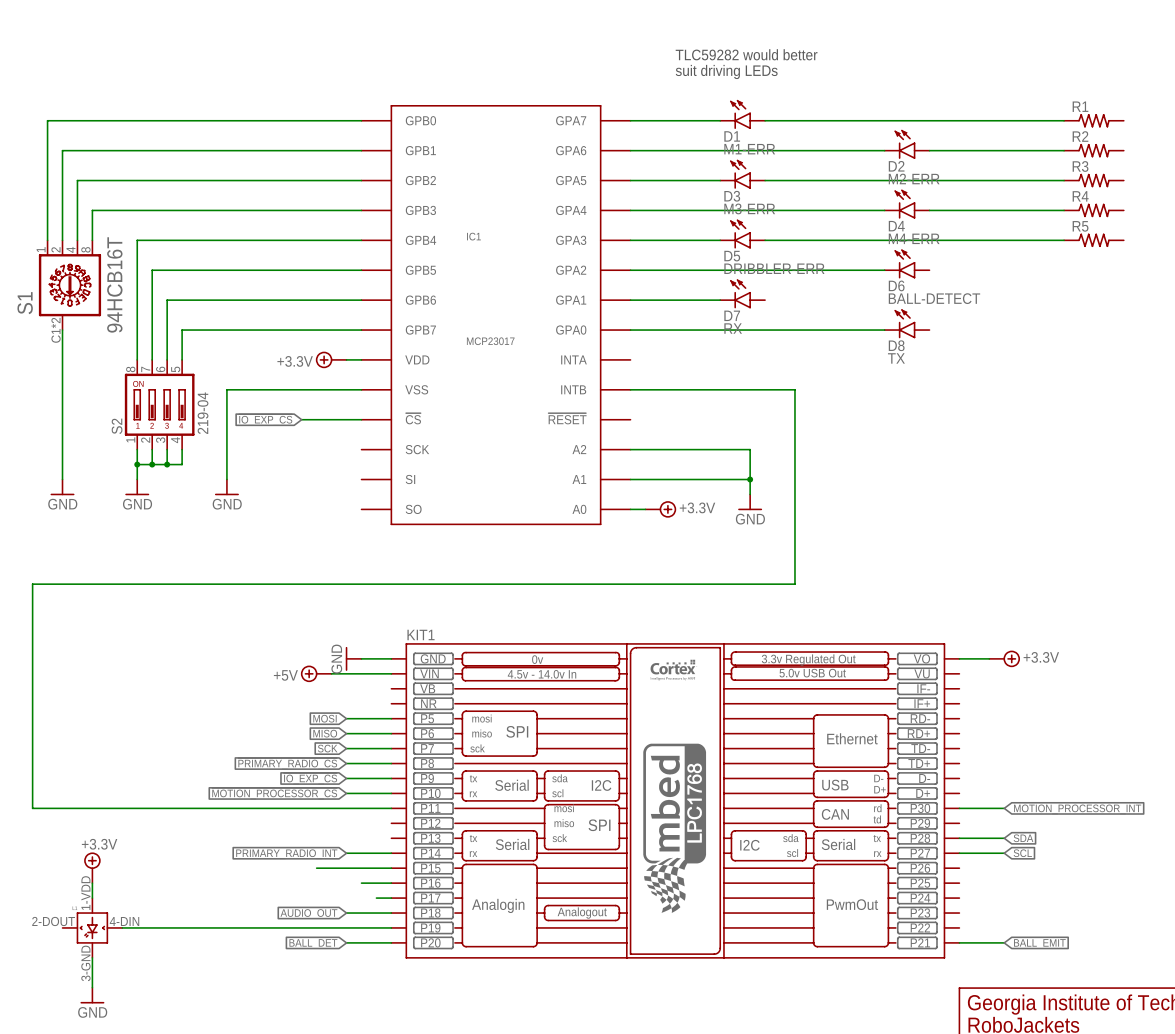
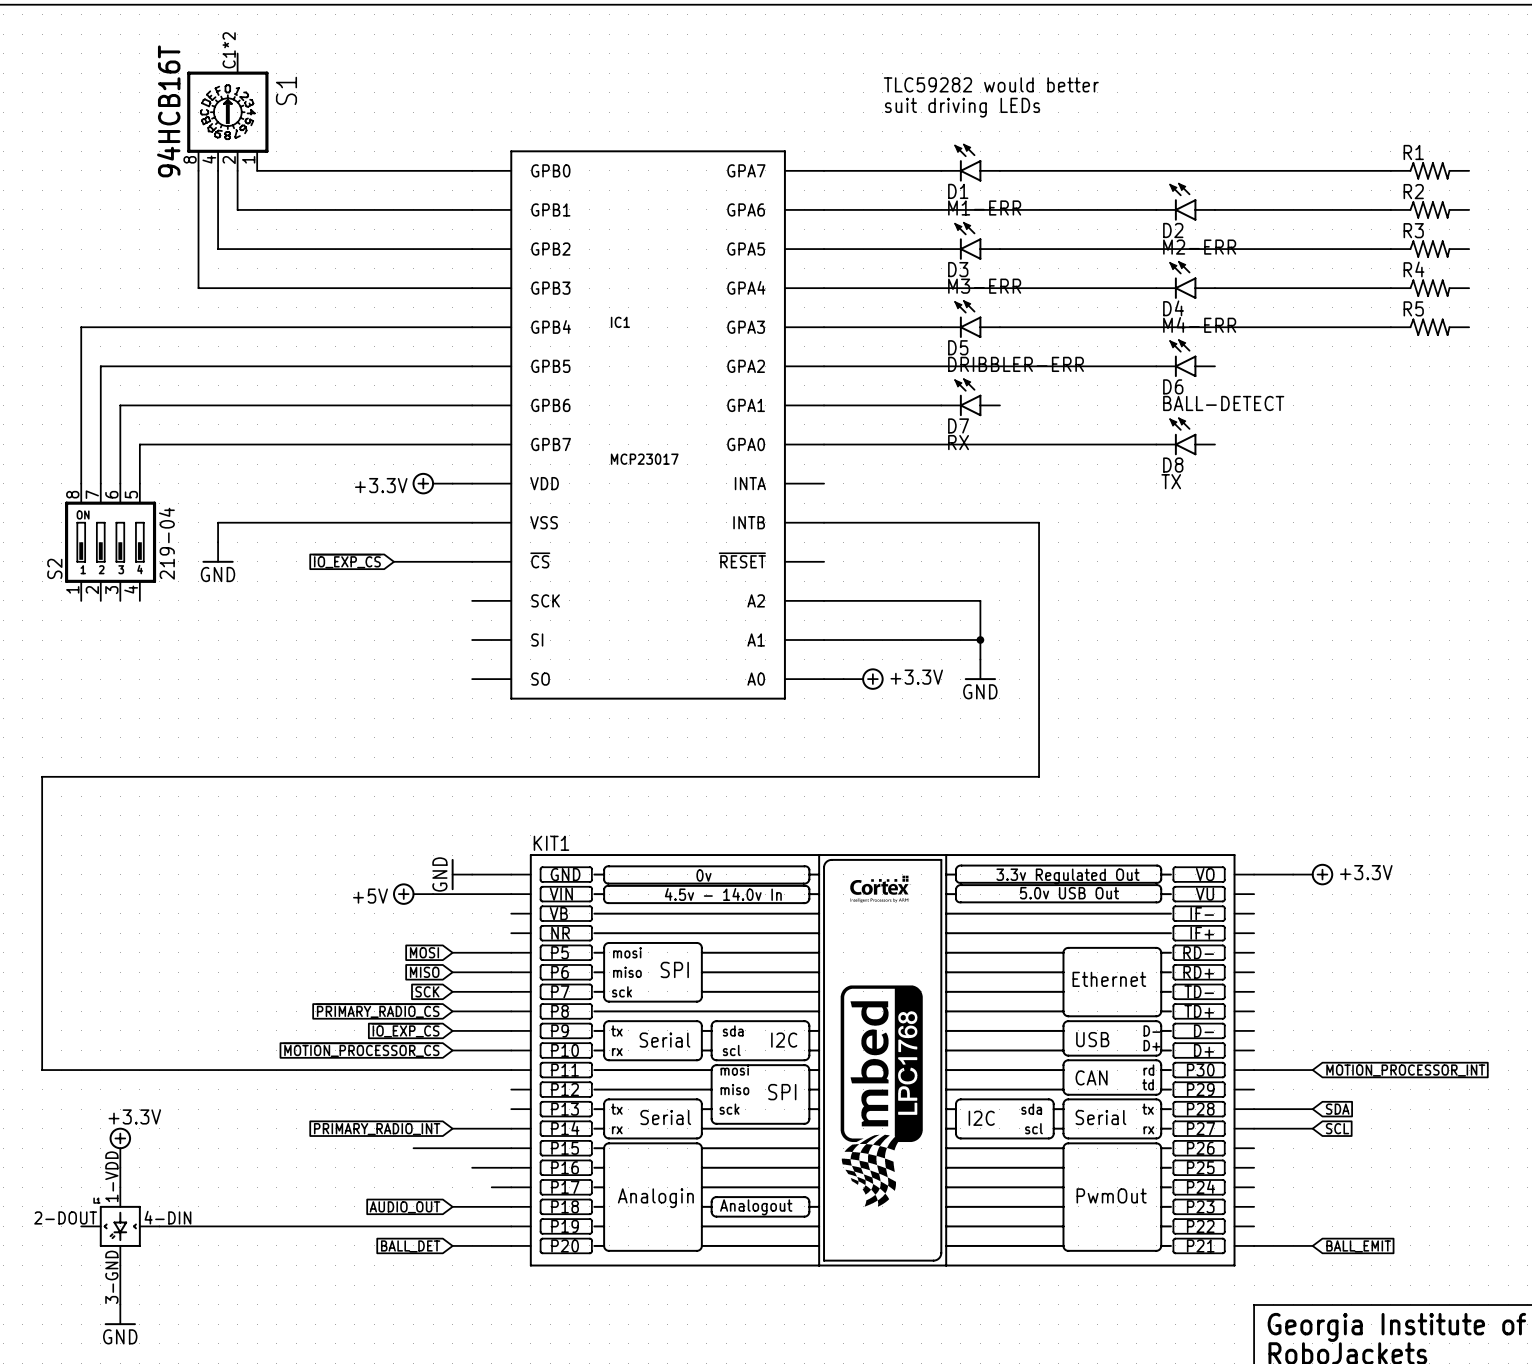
wire: (197, 120) (47, 120) (47, 240) -> none
wire: (182, 150) (62, 150) (62, 240) -> (237, 209) (237, 170)
wire: (167, 180) (77, 180) (77, 240) -> (218, 249) (218, 170)
wire: (152, 210) (92, 210) (92, 240) -> (198, 288) (198, 170)
wire: (137, 240) (137, 359) -> (178, 327) (81, 327) (81, 444)
wire: (152, 270) (152, 359) -> (198, 366) (100, 366) (100, 483)
S1 rotation: 0° (69, 285) -> 180° (227, 112)
S1 position: (69, 285) -> (227, 112)
wire: (167, 300) (167, 359) -> (218, 405) (120, 405) (120, 483)
wire: (182, 330) (182, 359) -> (237, 444) (139, 444) (139, 483)
wire: (62, 359) (62, 479) -> none
wire: (226, 389) (226, 479) -> (296, 522) (218, 522) (218, 542)
S2 position: (159, 404) -> (110, 542)
power symbol: none -> GND (218, 552)
wire: (137, 449) (137, 479) -> none
wire: (152, 449) (152, 464) -> none
wire: (167, 449) (167, 464) -> none
wire: (182, 449) (182, 464) (137, 464) -> none
junction: (137, 464) -> none
junction: (152, 464) -> none
junction: (167, 464) -> none
power symbol: GND (62, 487) -> none
power symbol: GND (137, 487) -> none
power symbol: GND (226, 487) -> none

